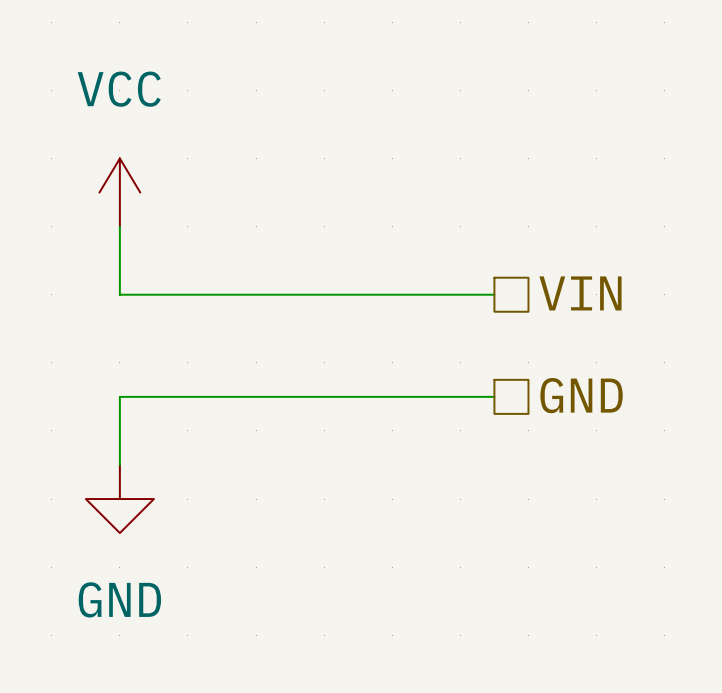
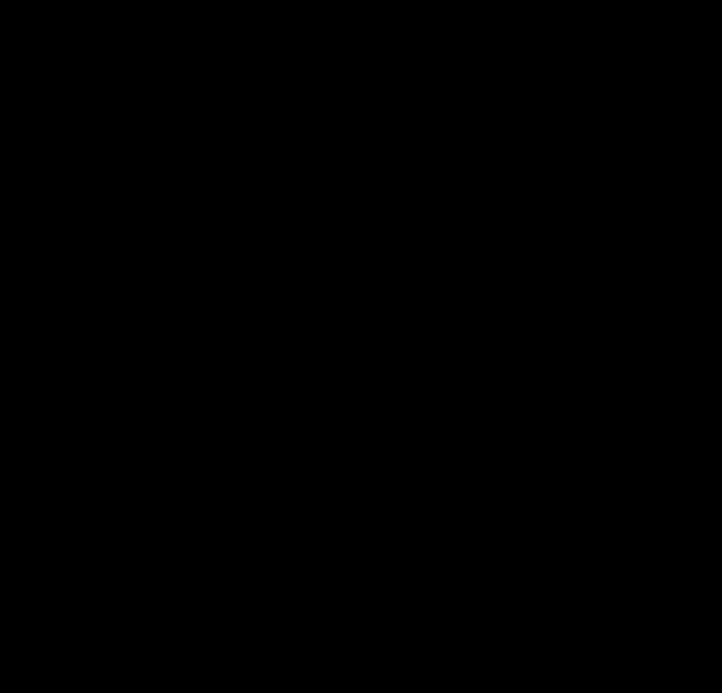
power symbol: VCC (119, 192) -> none
wire: (119, 226) (119, 294) (494, 294) -> none
hierarchical label: VIN (580, 293) -> none
hierarchical label: GND (581, 395) -> none
wire: (494, 396) (119, 396) (119, 464) -> none
power symbol: GND (119, 499) -> none

